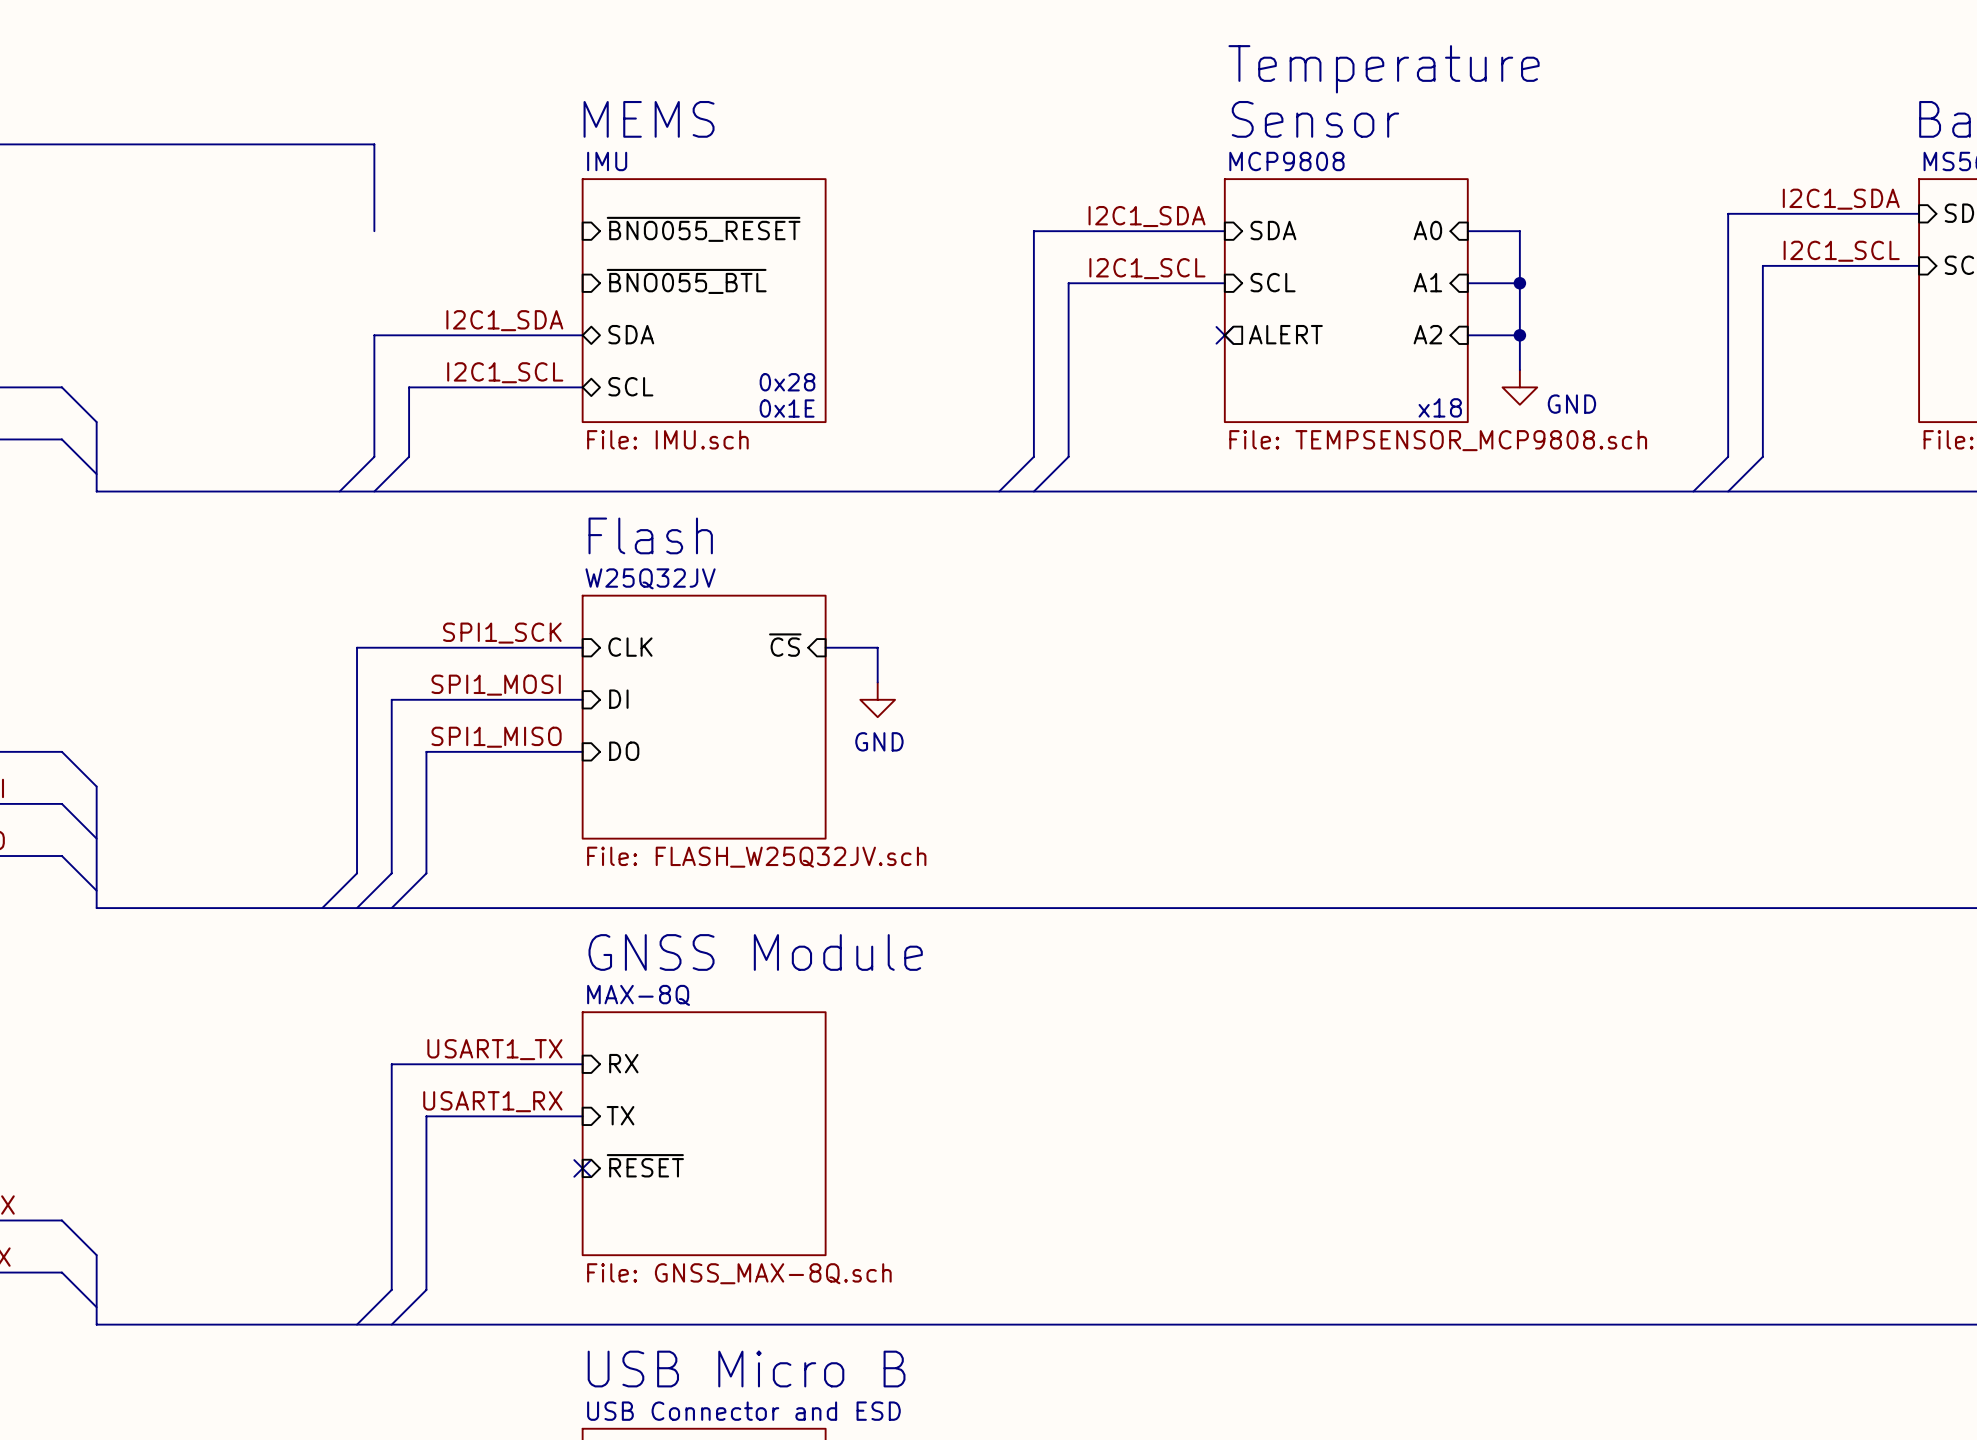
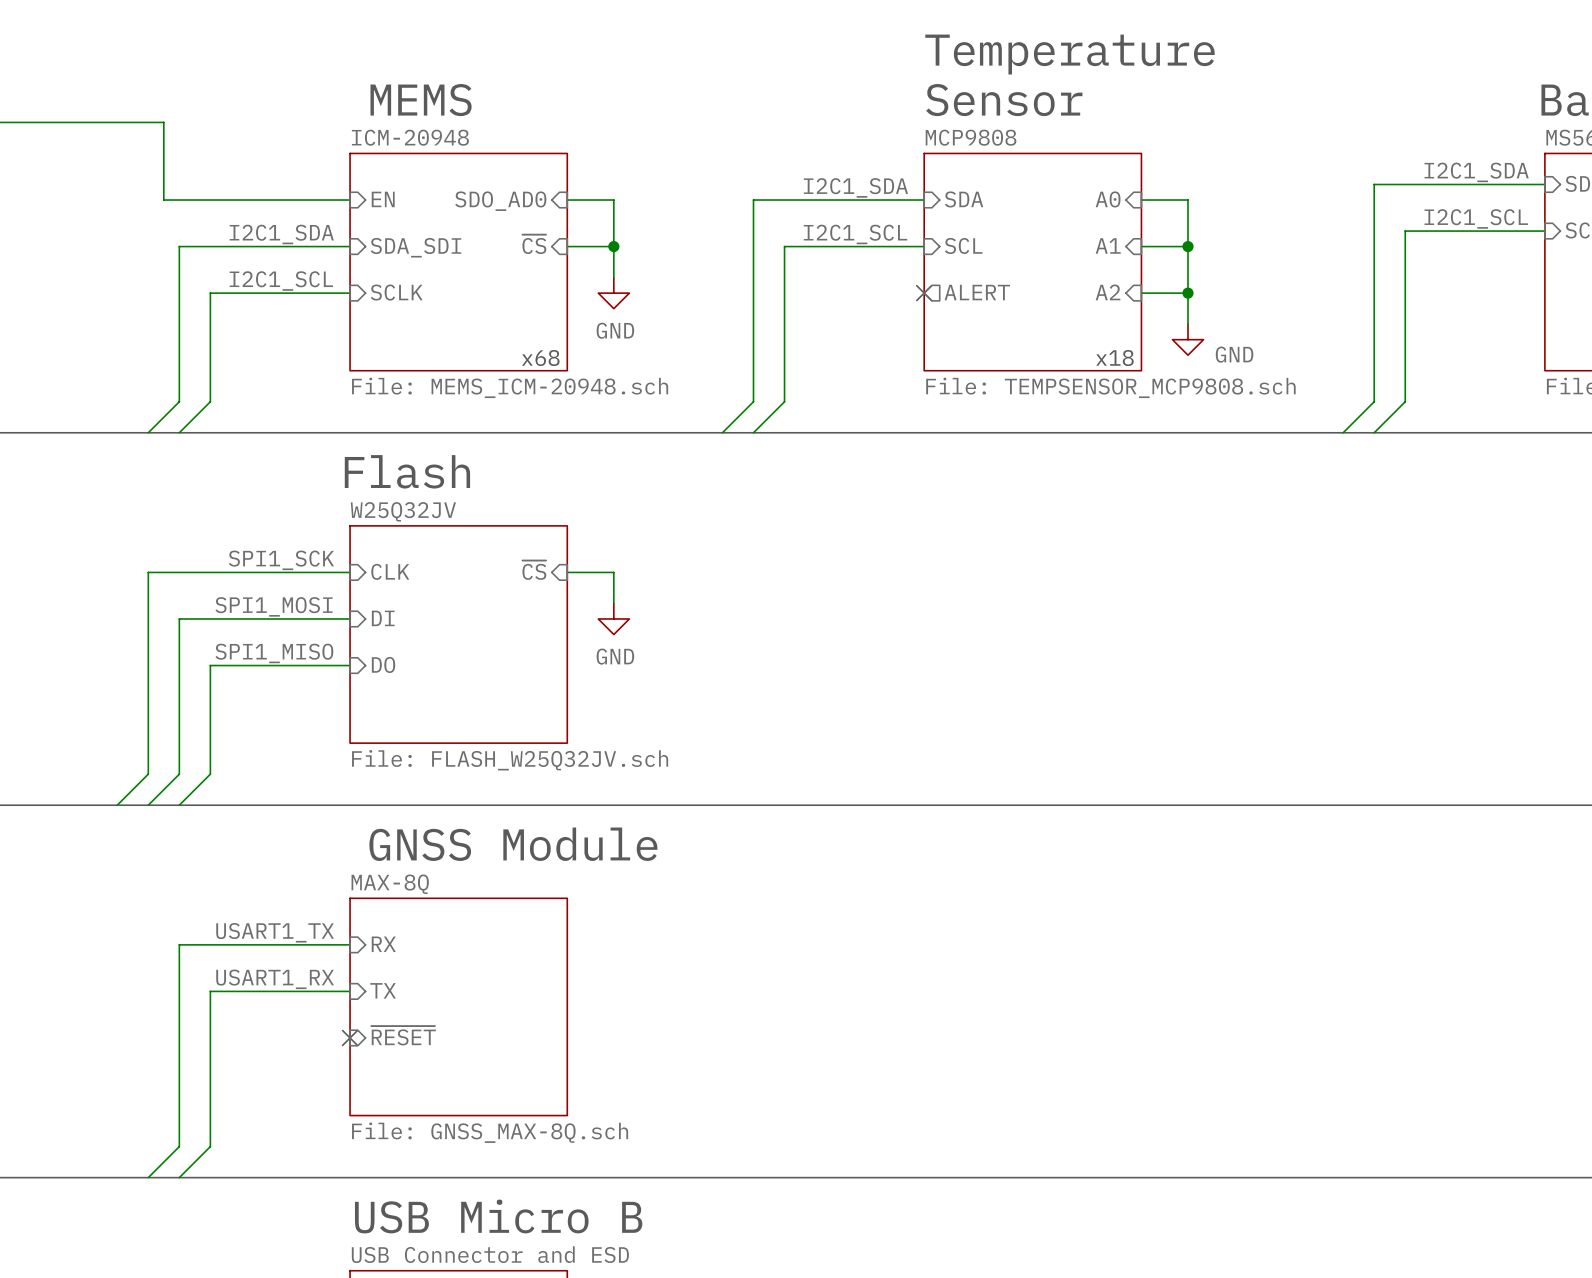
sheet IMU name: IMU (607, 161) -> ICM-20948 (410, 137)
sheet pin: ~{BNO055_RESET} (703, 229) -> EN (383, 199)
wire: none -> (163, 200) (350, 200)
sheet pin: none -> SDO_AD0 (500, 201)
wire: none -> (567, 200) (613, 200) (613, 277)
label: none -> I2C1_SDA (281, 234)
sheet pin: none -> ~{CS} (534, 244)
sheet pin: ~{BNO055_BTL} (686, 281) -> SDA_SDI (416, 247)
wire: none -> (350, 246) (179, 246) (179, 401) (148, 432)
wire: none -> (567, 246) (613, 246)
junction: none -> (613, 246)
label: I2C1_SDA (504, 320) -> I2C1_SCL (281, 281)
sheet pin shape: bidirectional (631, 334) -> input (396, 292)
sheet pin: SDA (631, 334) -> SCLK (396, 292)
wire: (426, 335) (374, 335) (374, 456) (339, 491) -> (210, 293) (210, 401) (179, 432)
power symbol: none -> GND (613, 293)
label: I2C1_SCL (505, 372) -> none
text: 0x28 (787, 382) -> none
sheet pin: SCL (630, 386) -> none
wire: (582, 387) (409, 387) (409, 456) (374, 491) -> none
text: none -> x68 (540, 358)
text: 0x1E (787, 408) -> none
sheet IMU value: File: IMU.sch (667, 439) -> File: MEMS_ICM-20948.sch (510, 387)

